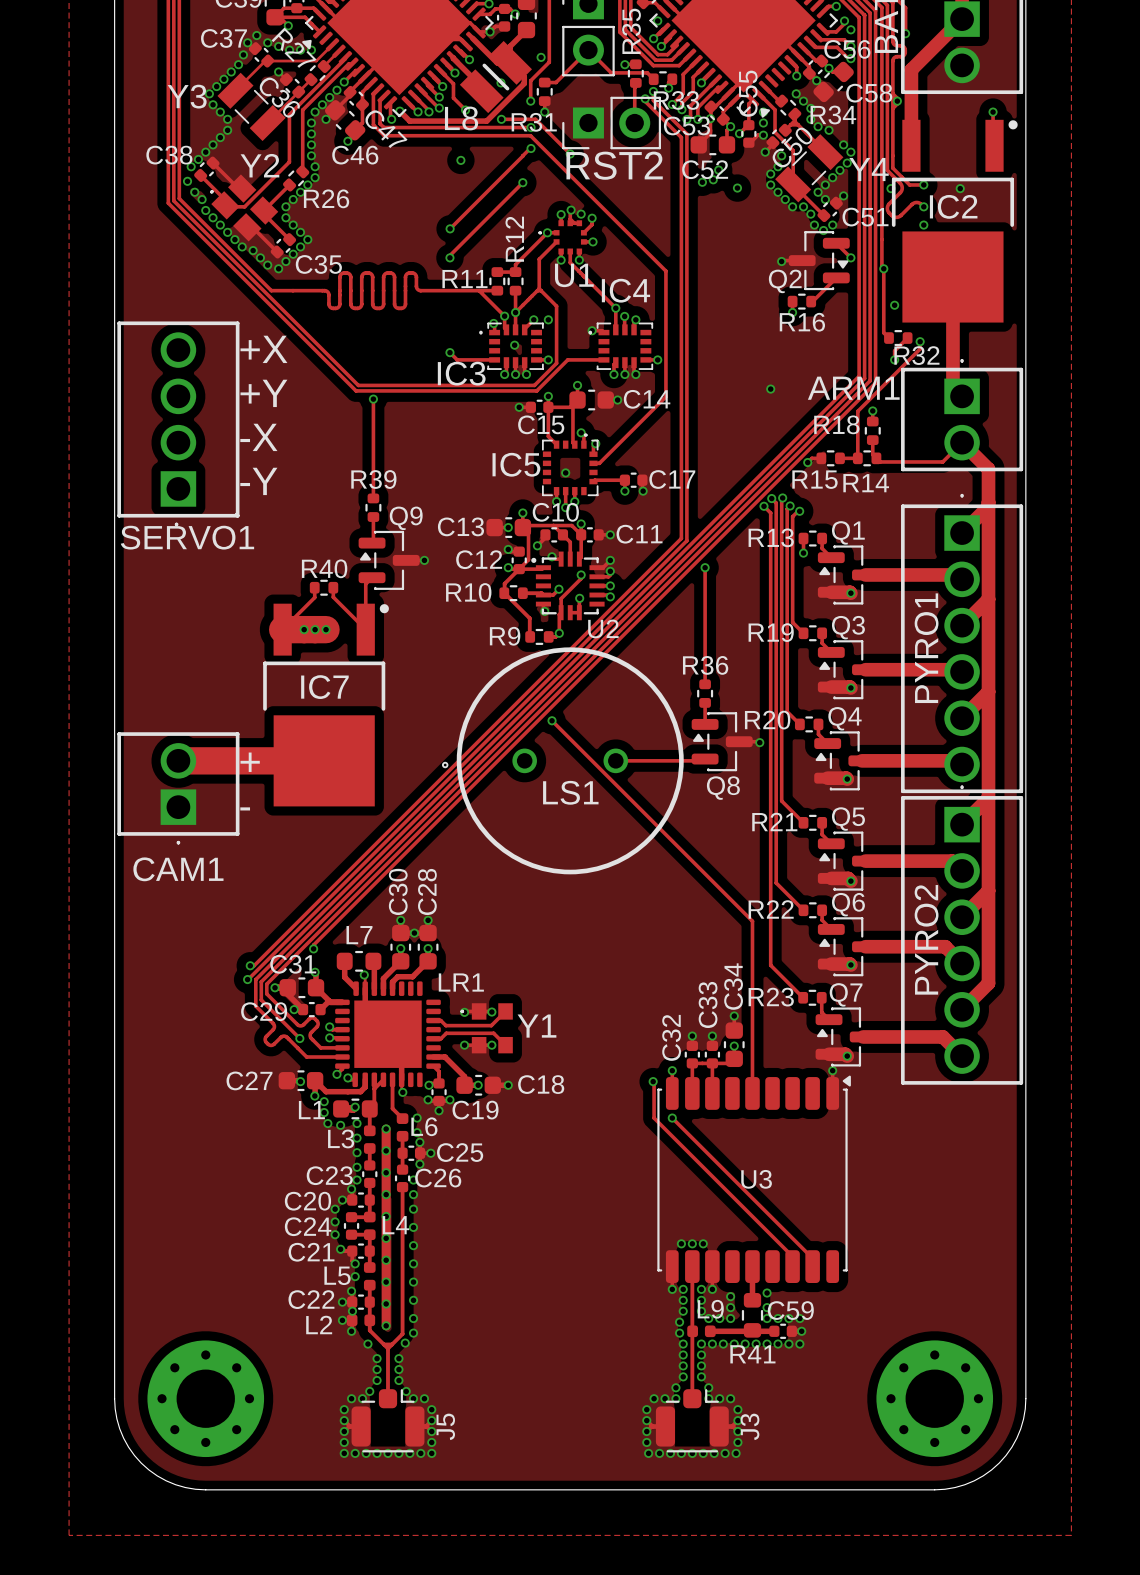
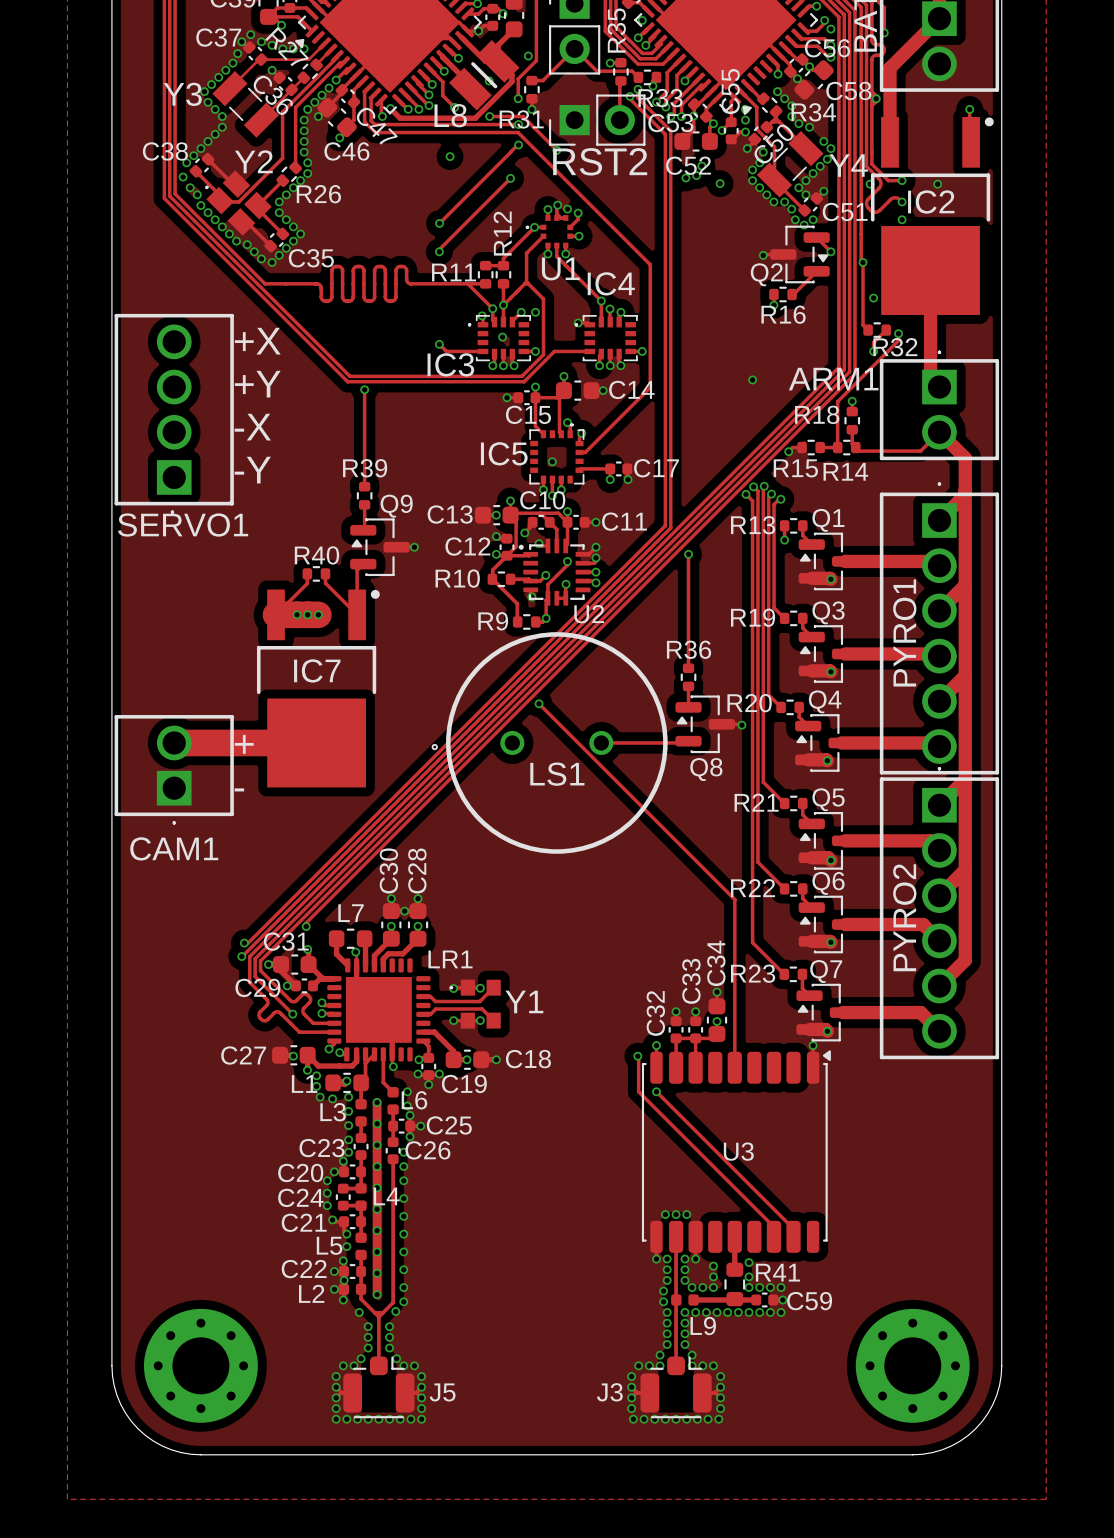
L9 name position: L9 (710, 1309) -> L9 (703, 1326)
C59 name position: C59 (790, 1310) -> C59 (809, 1301)
R41 name position: R41 (752, 1354) -> R41 (777, 1272)
J5 name rotation: 0° (445, 1426) -> 90° clockwise (442, 1392)
J3 name rotation: 0° (749, 1426) -> 90° clockwise (609, 1392)
J3 name position: J3 (749, 1426) -> J3 (609, 1392)

